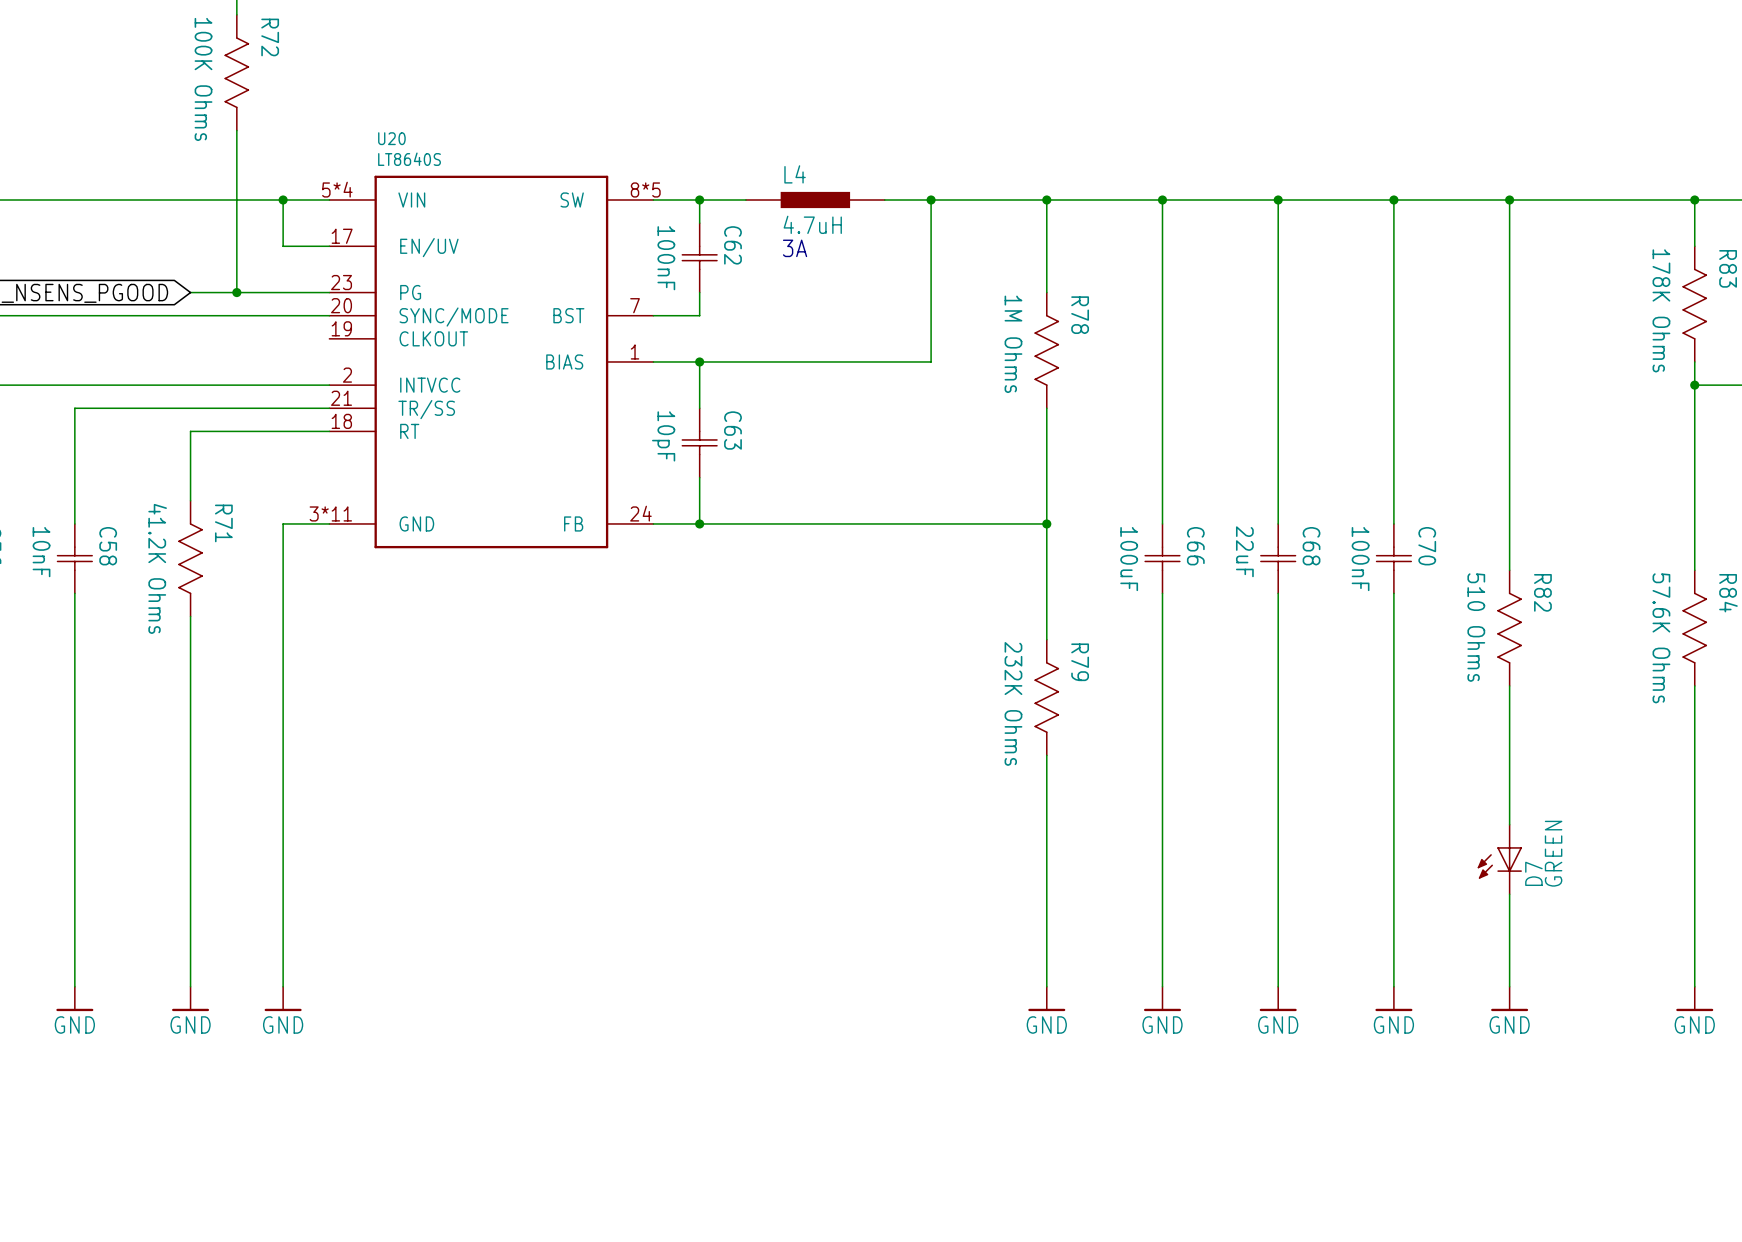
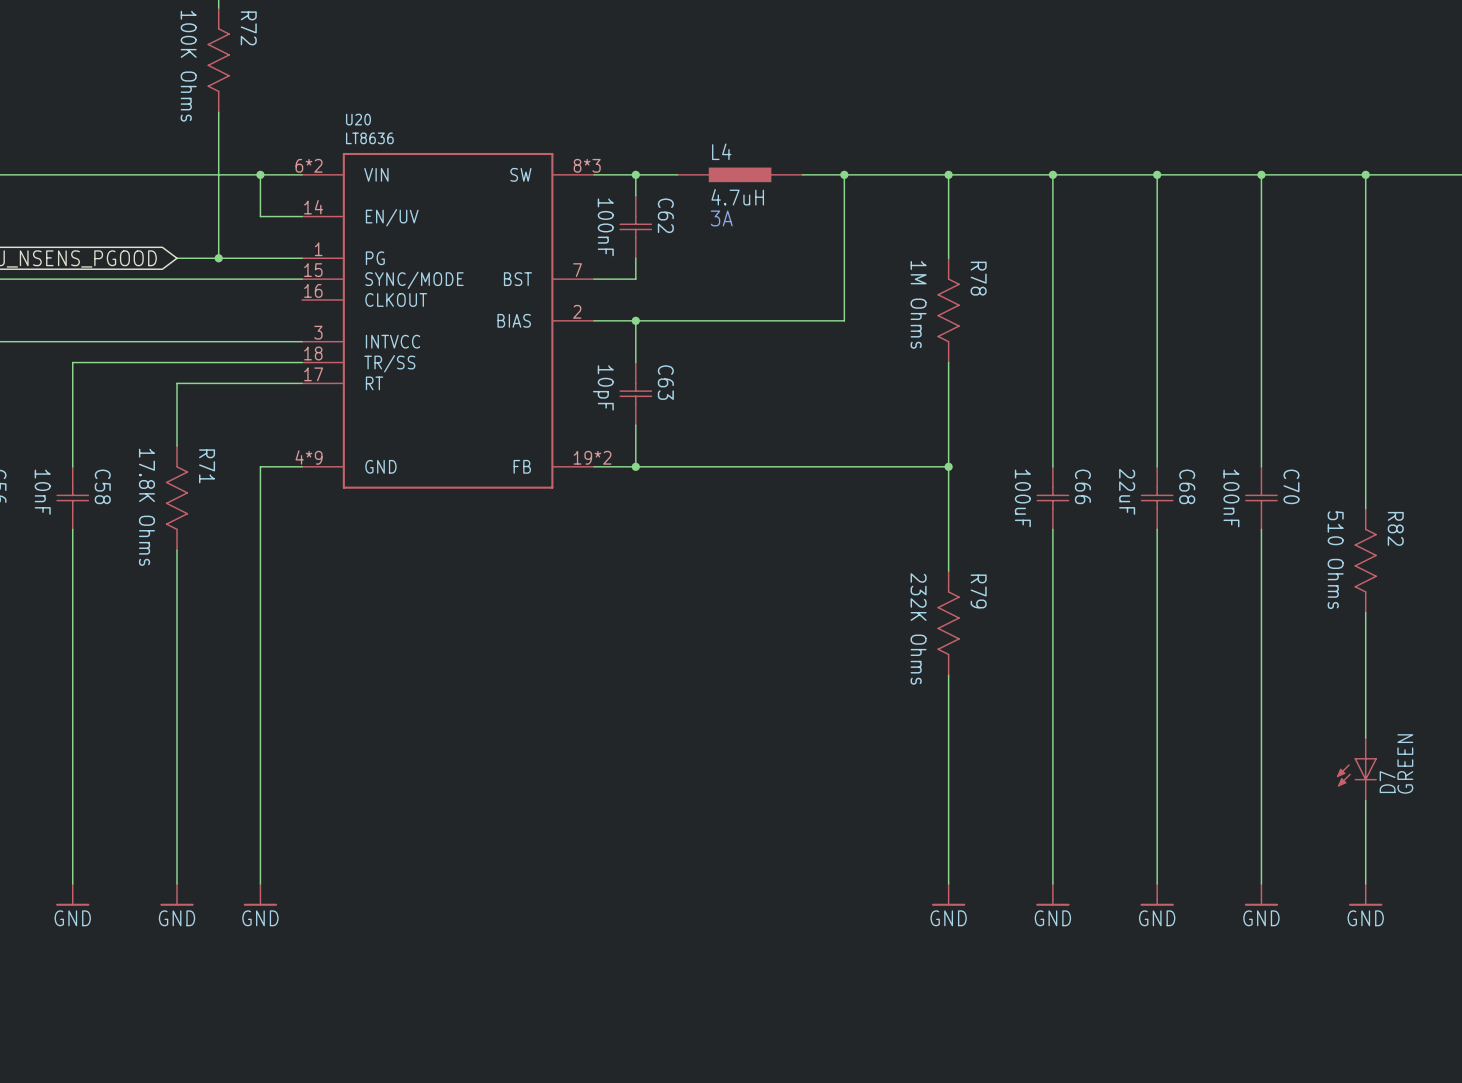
U20 value: LT8640S (409, 159) -> LT8636 (369, 138)
U20 symbol: [329, 175, 654, 549] -> [302, 152, 595, 489]
R71 value: 41.2K Ohms (157, 568) -> 17.8K Ohms (146, 507)

